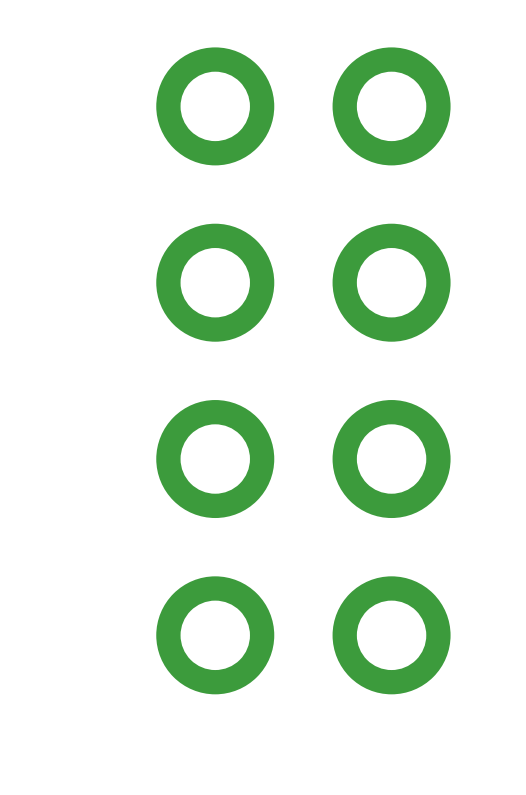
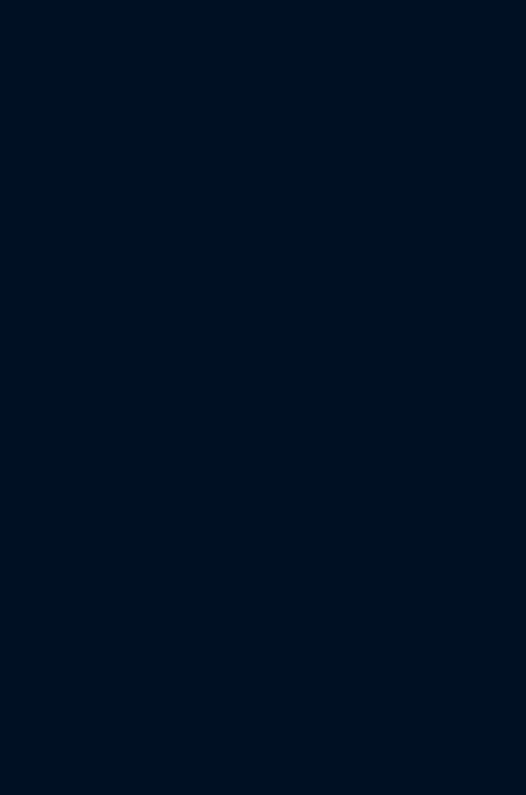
part: (303, 370) -> none

